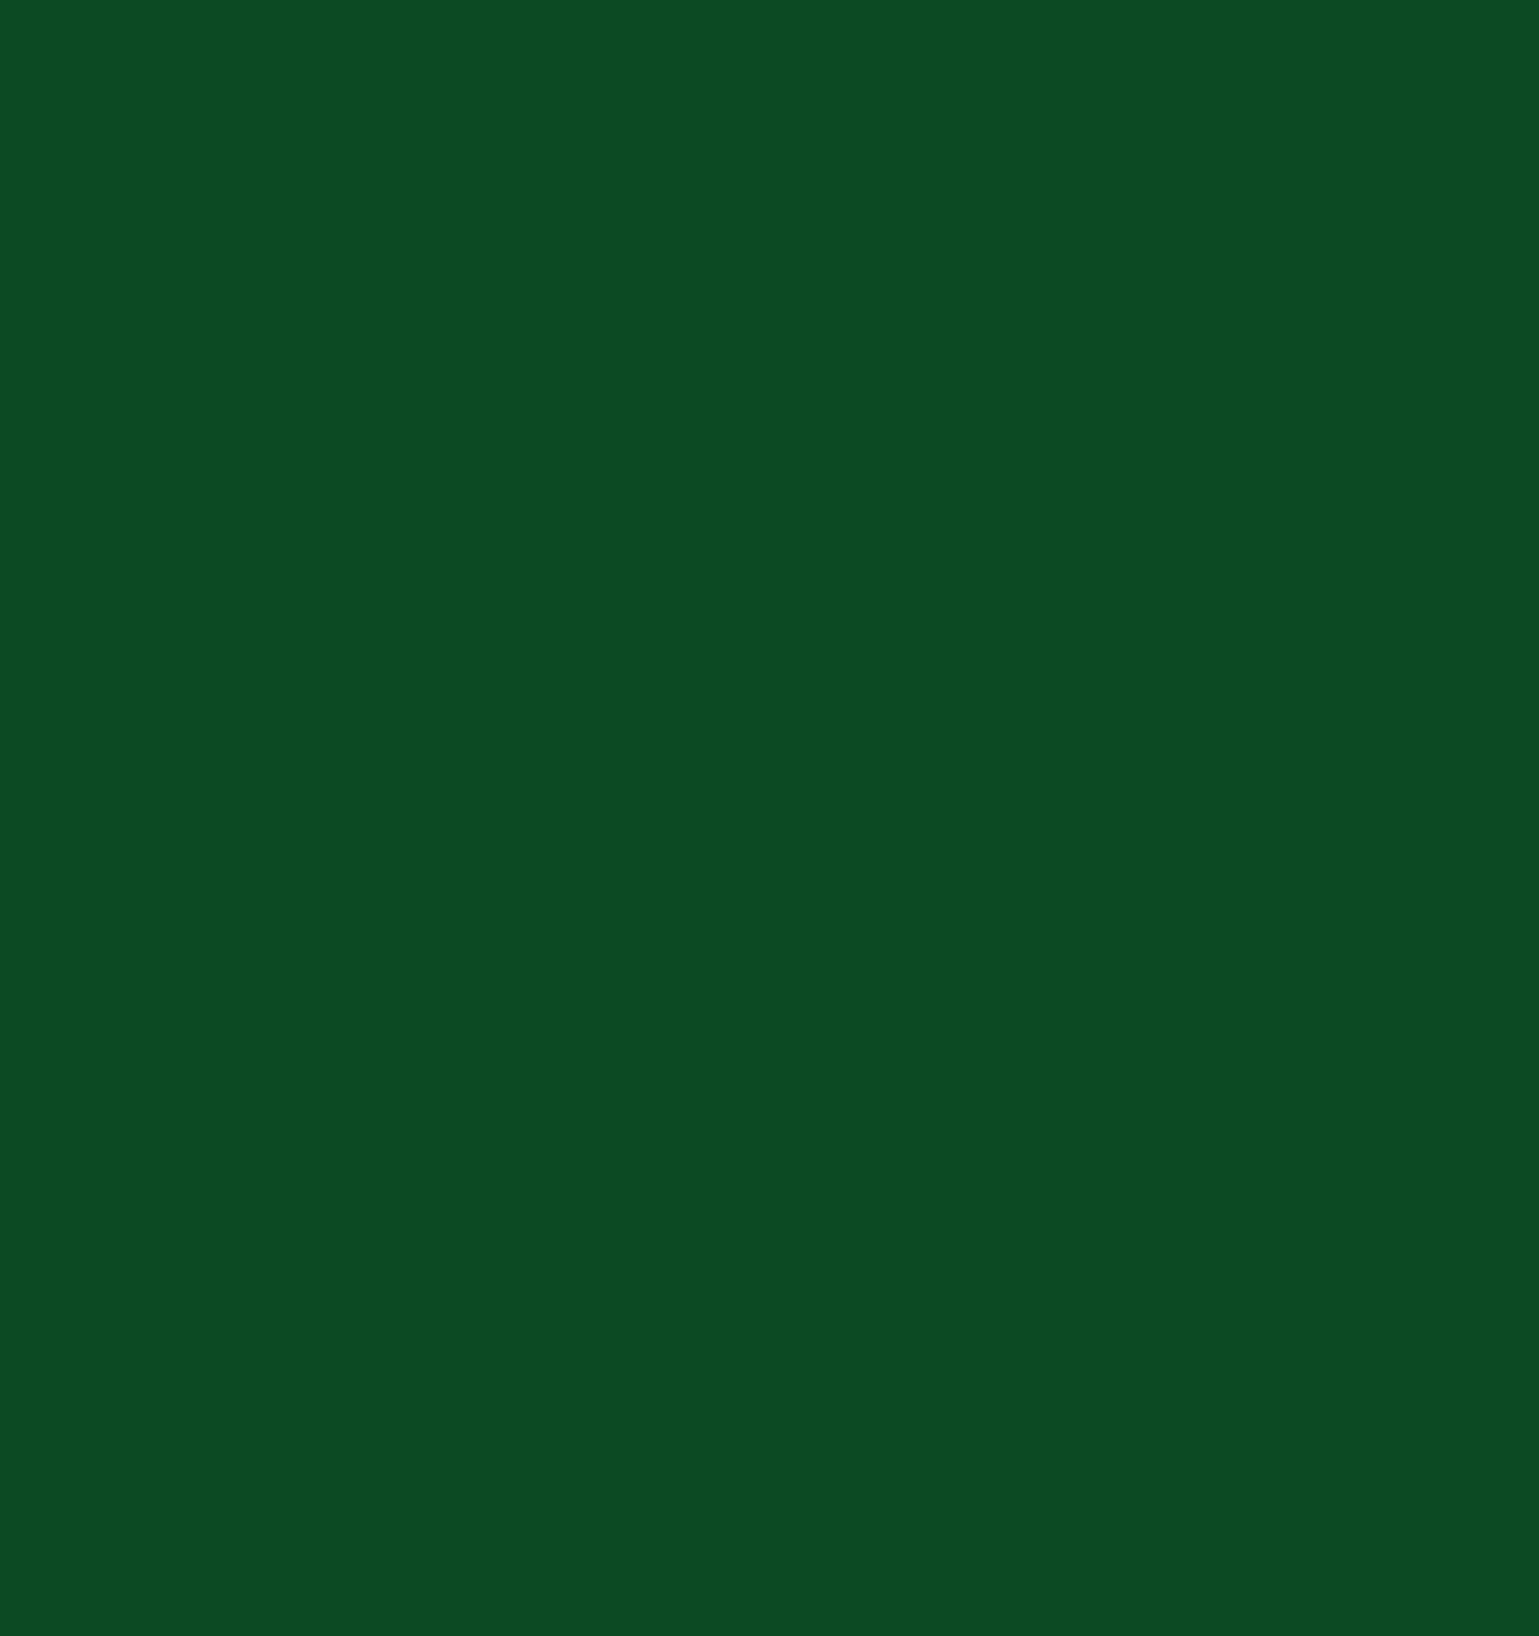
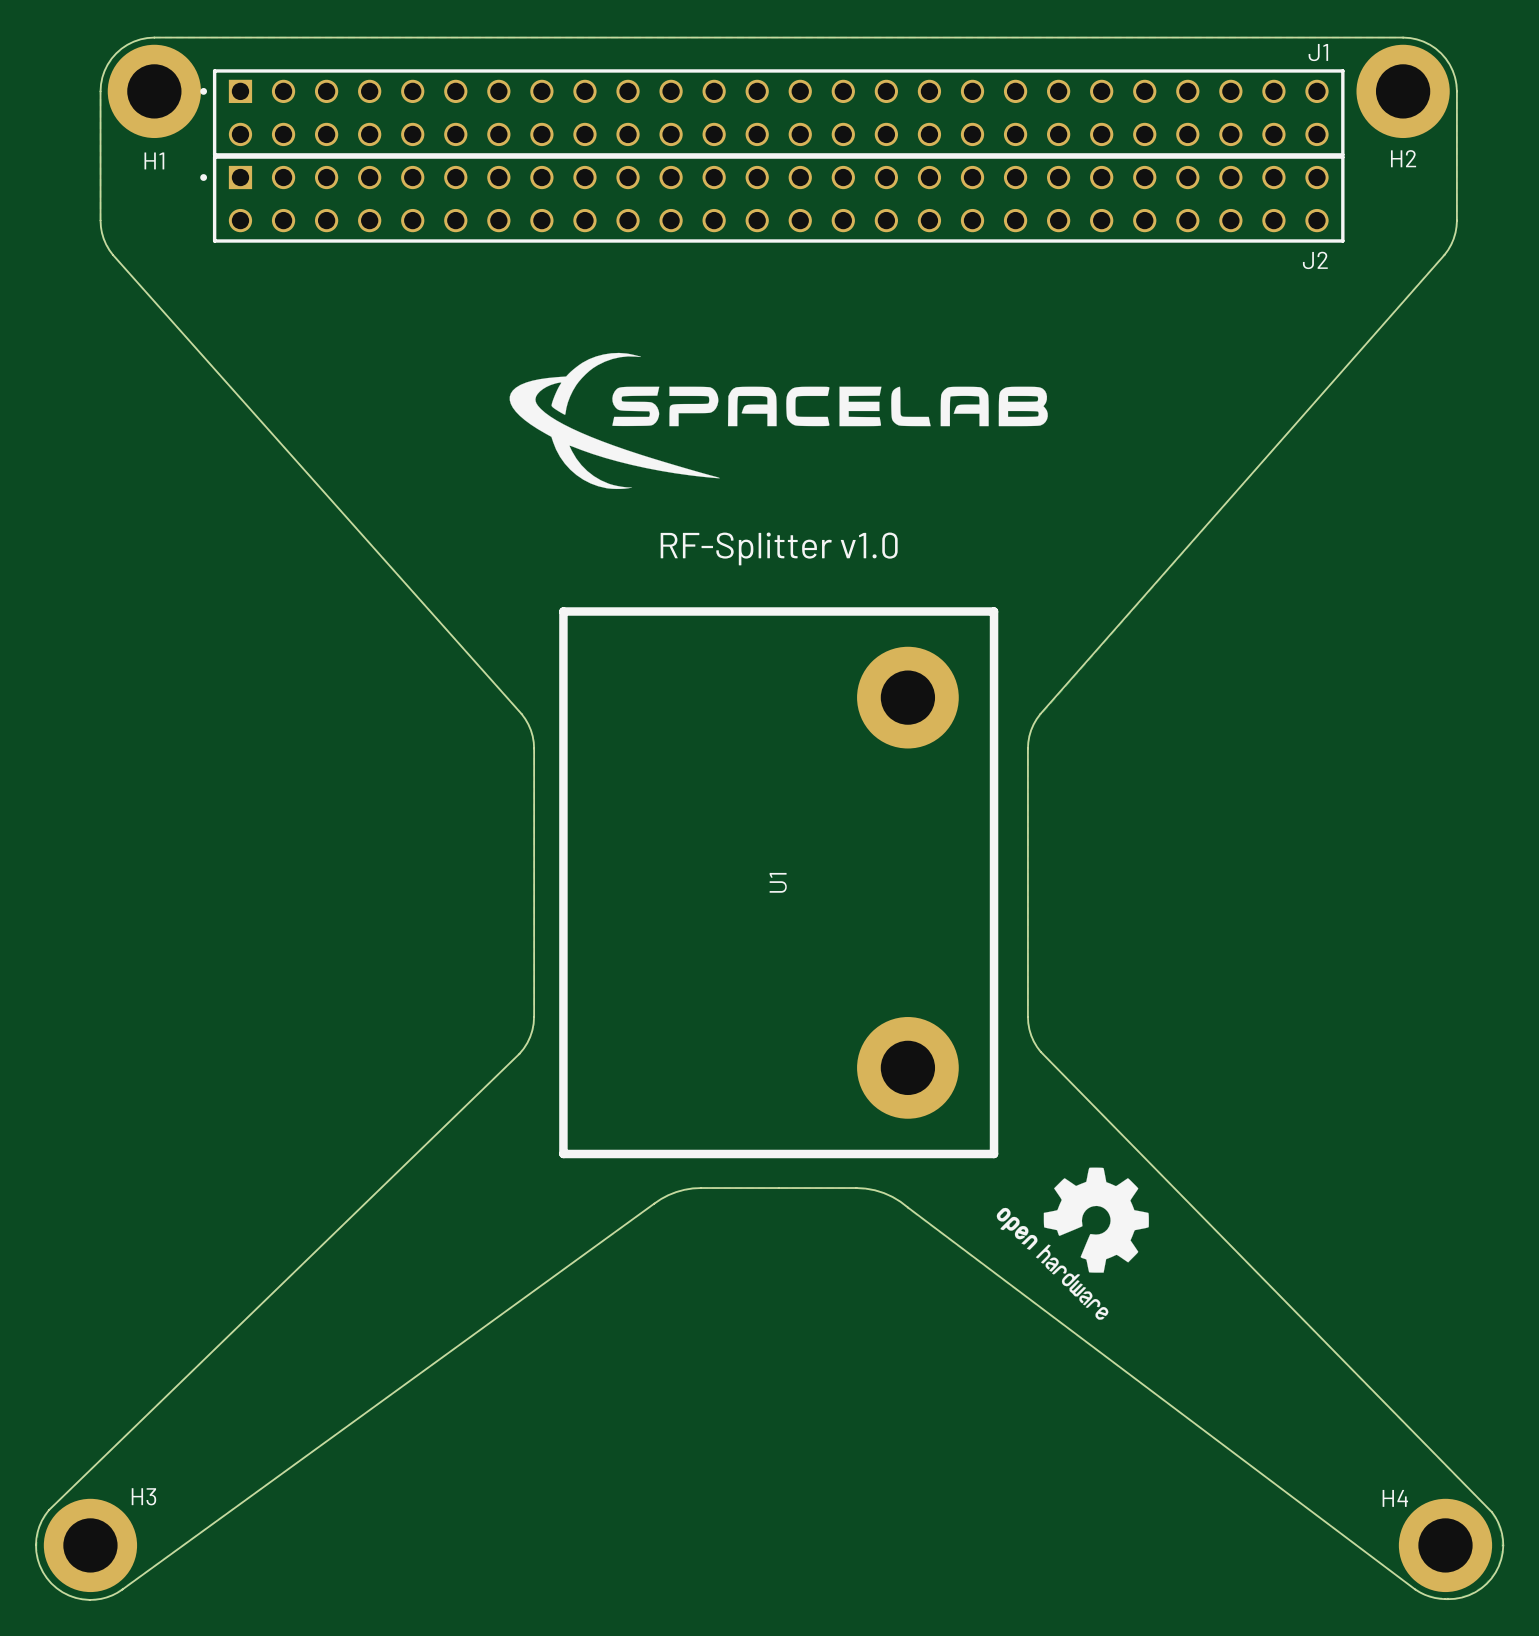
board edge: none -> (100, 91) (100, 220) (101, 232) (109, 250) (521, 714) (528, 724) (534, 748) (534, 1017) (530, 1036) (519, 1053) (48, 1510) (39, 1526) (35, 1544) (39, 1565) (51, 1583) (62, 1592) (82, 1599) (101, 1598) (117, 1592) (668, 1195) (684, 1189) (701, 1188) (856, 1188) (883, 1193) (900, 1201) (1415, 1589) (1434, 1597) (1455, 1598) (1468, 1595) (1486, 1583) (1498, 1566) (1503, 1545) (1500, 1528) (1492, 1512) (1040, 1052) (1031, 1035) (1027, 1017) (1027, 748) (1033, 724) (1040, 714) (1448, 250) (1453, 238) (1456, 220) (1456, 91) (1452, 70) (1441, 53) (1423, 41) (1403, 37) (154, 37) (133, 41) (116, 53) (104, 70) (100, 91)
H1: none -> (154, 91)
H2: none -> (1403, 91)
J1: none -> (772, 112)
J2: none -> (772, 199)
drawing: none -> [509, 352, 1048, 490]
text: none -> RF-Splitter v1.0 (779, 548)
U1: none -> (778, 882)
drawing: none -> [996, 1167, 1149, 1320]
H3: none -> (90, 1545)
H4: none -> (1445, 1545)

